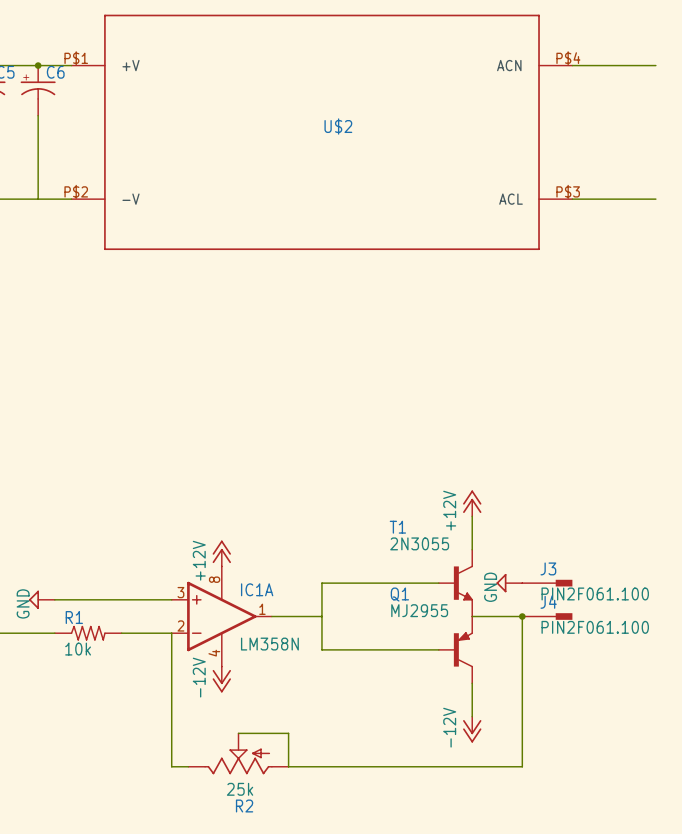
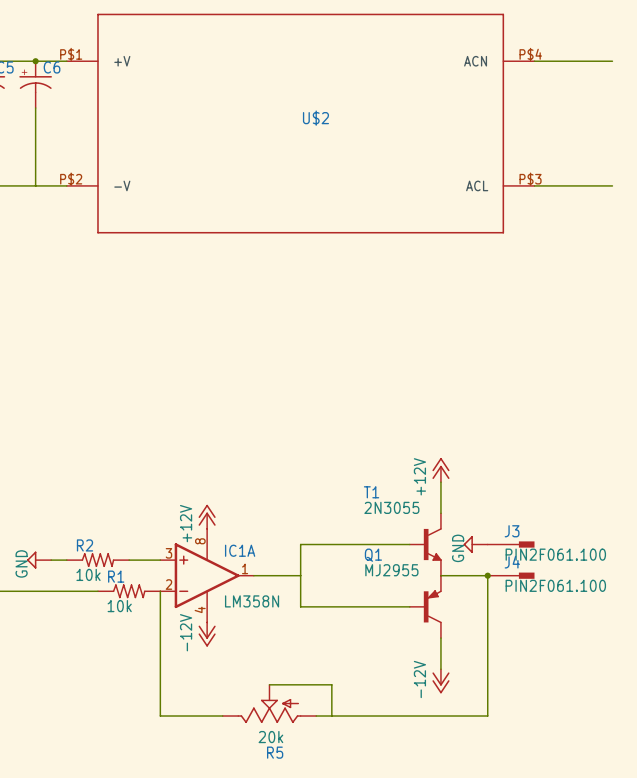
R1 position: (88, 633) -> (129, 591)
R2 symbol: [188, 733, 289, 775] -> [66, 553, 130, 567]
wire: (238, 733) (288, 733) (288, 766) (338, 766) -> none
wire: none -> (269, 684) (331, 684) (331, 716)
R5: none -> 20k (269, 703)
R2 value: 25k (240, 789) -> 10k (88, 574)
R2 name position: R2 (244, 806) -> R2 (85, 545)

